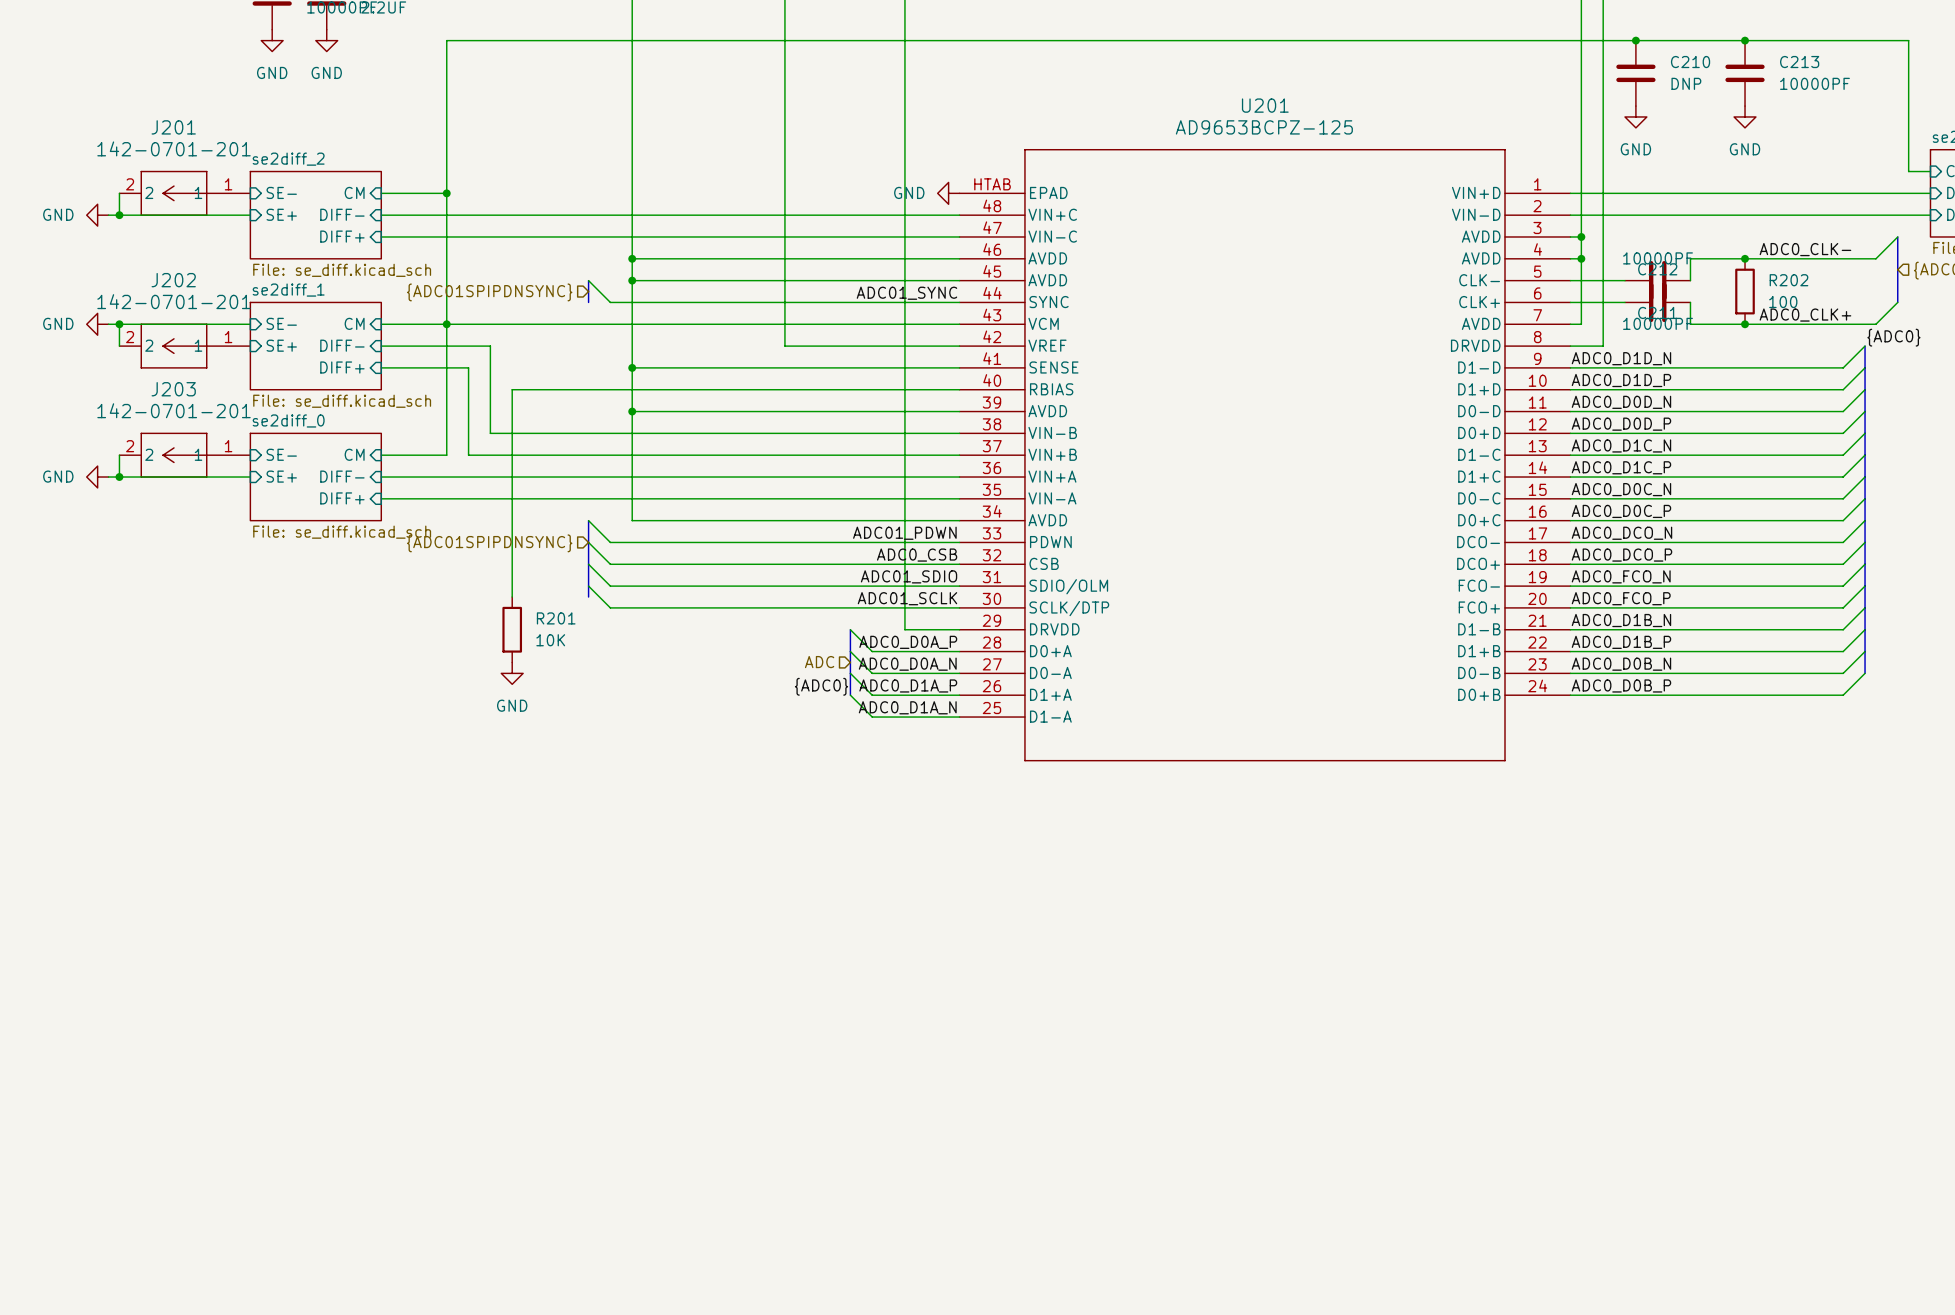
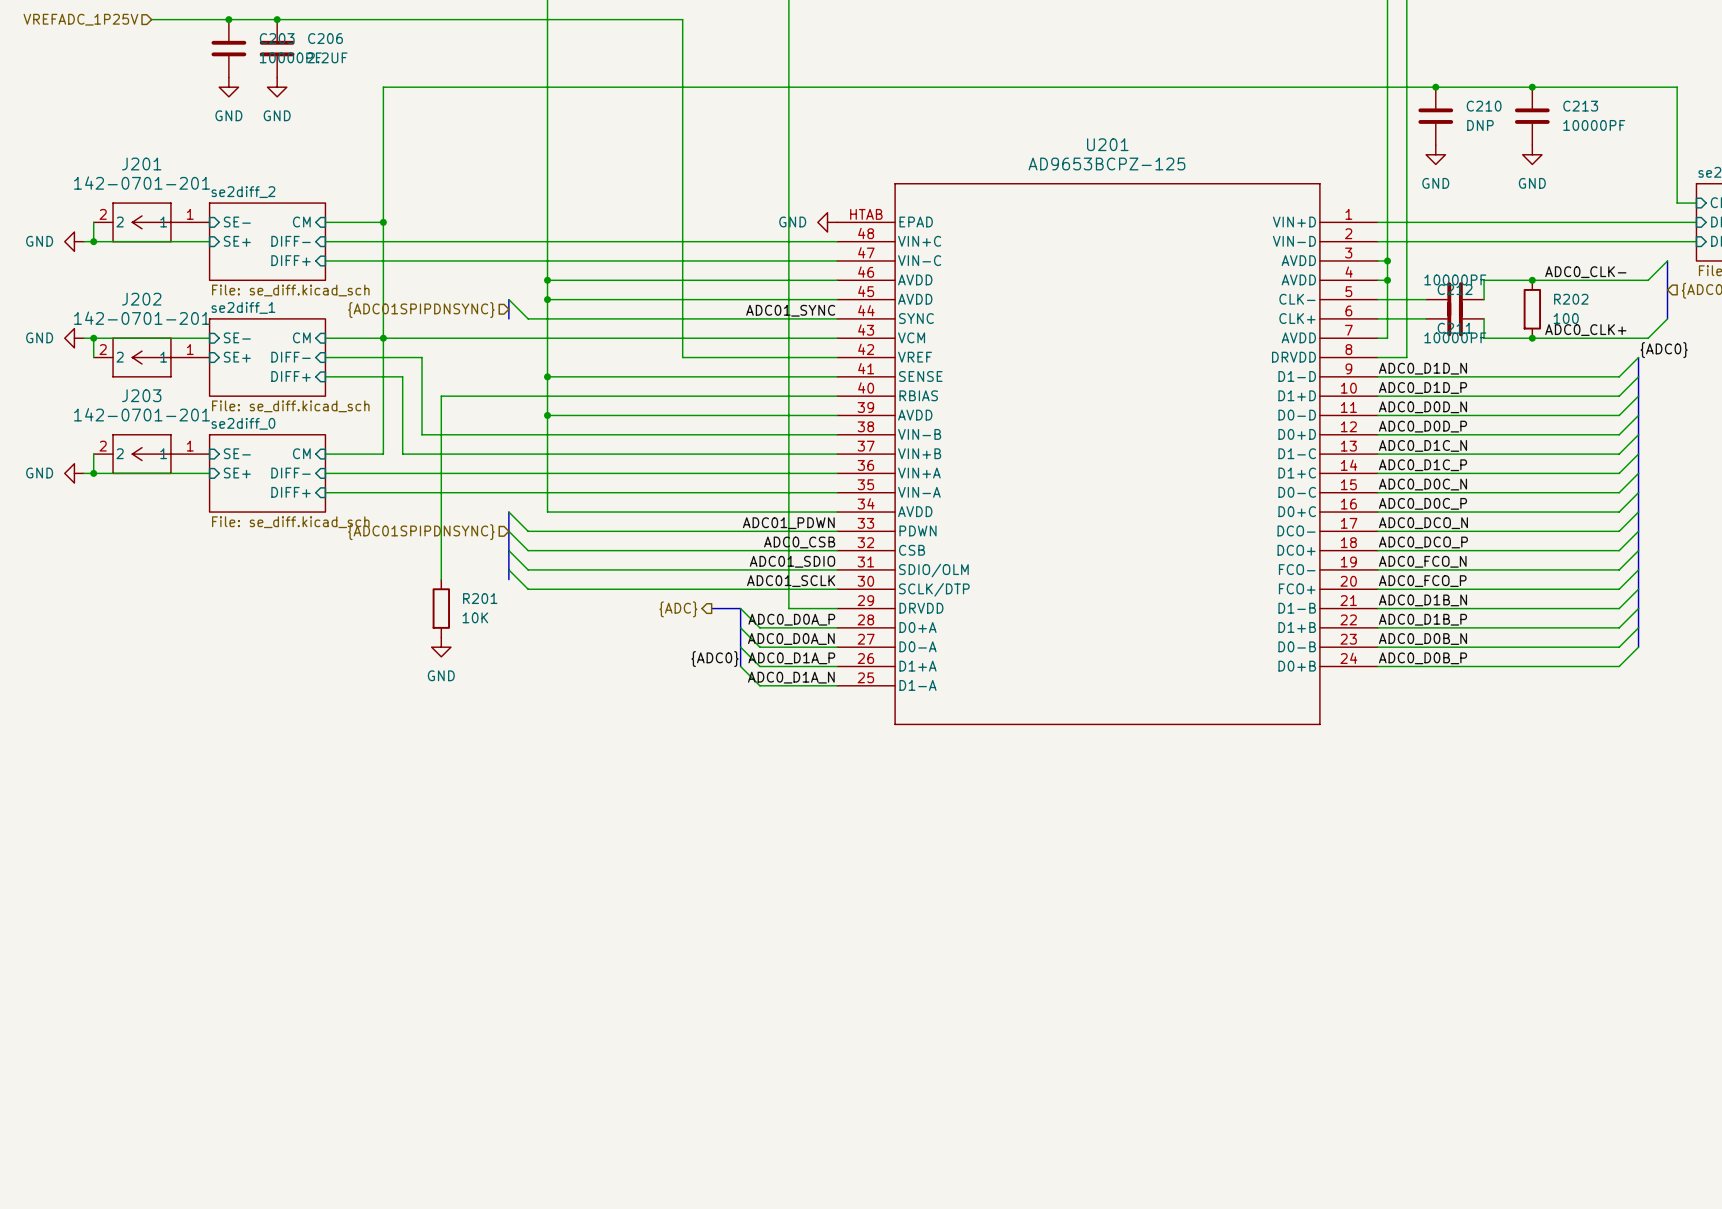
bus: none -> (711, 608) (740, 608)
hierarchical label: none -> {ADC} (678, 609)
hierarchical label: ADC (819, 662) -> none

